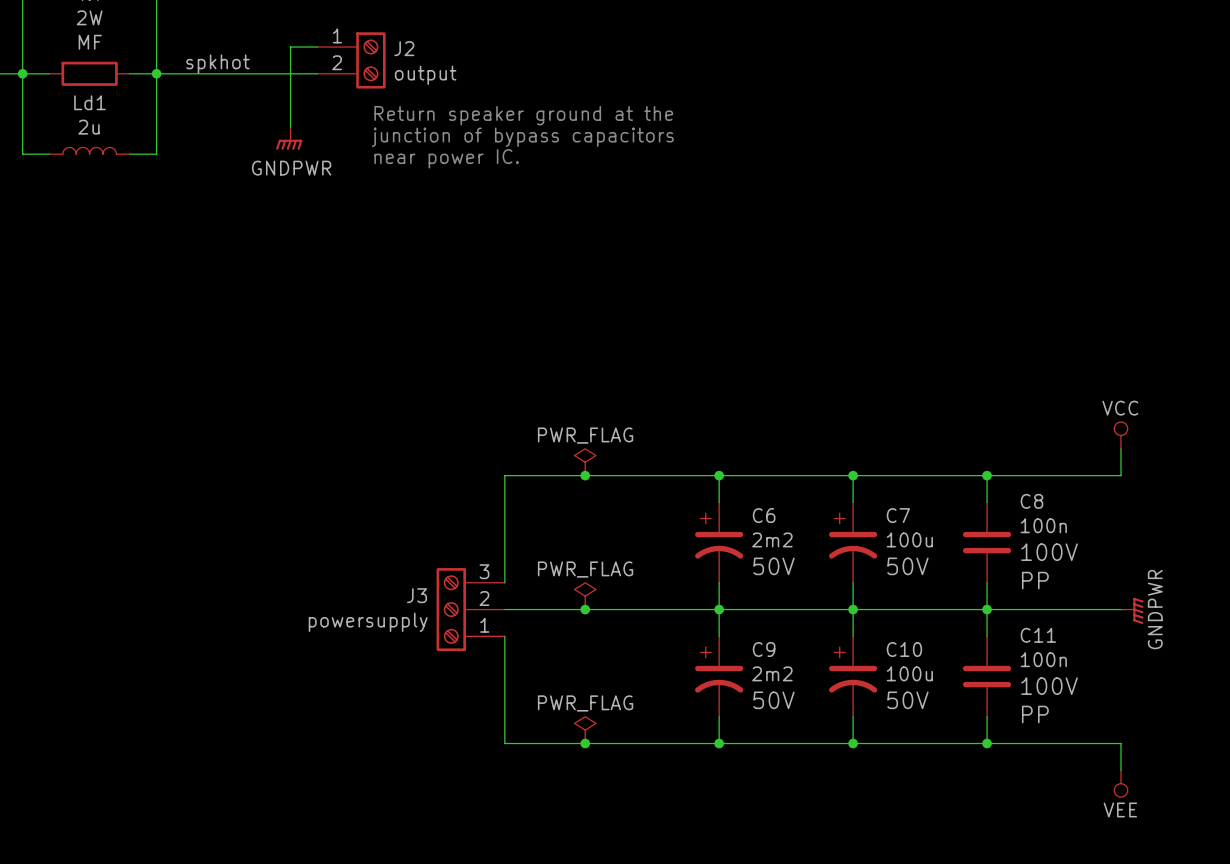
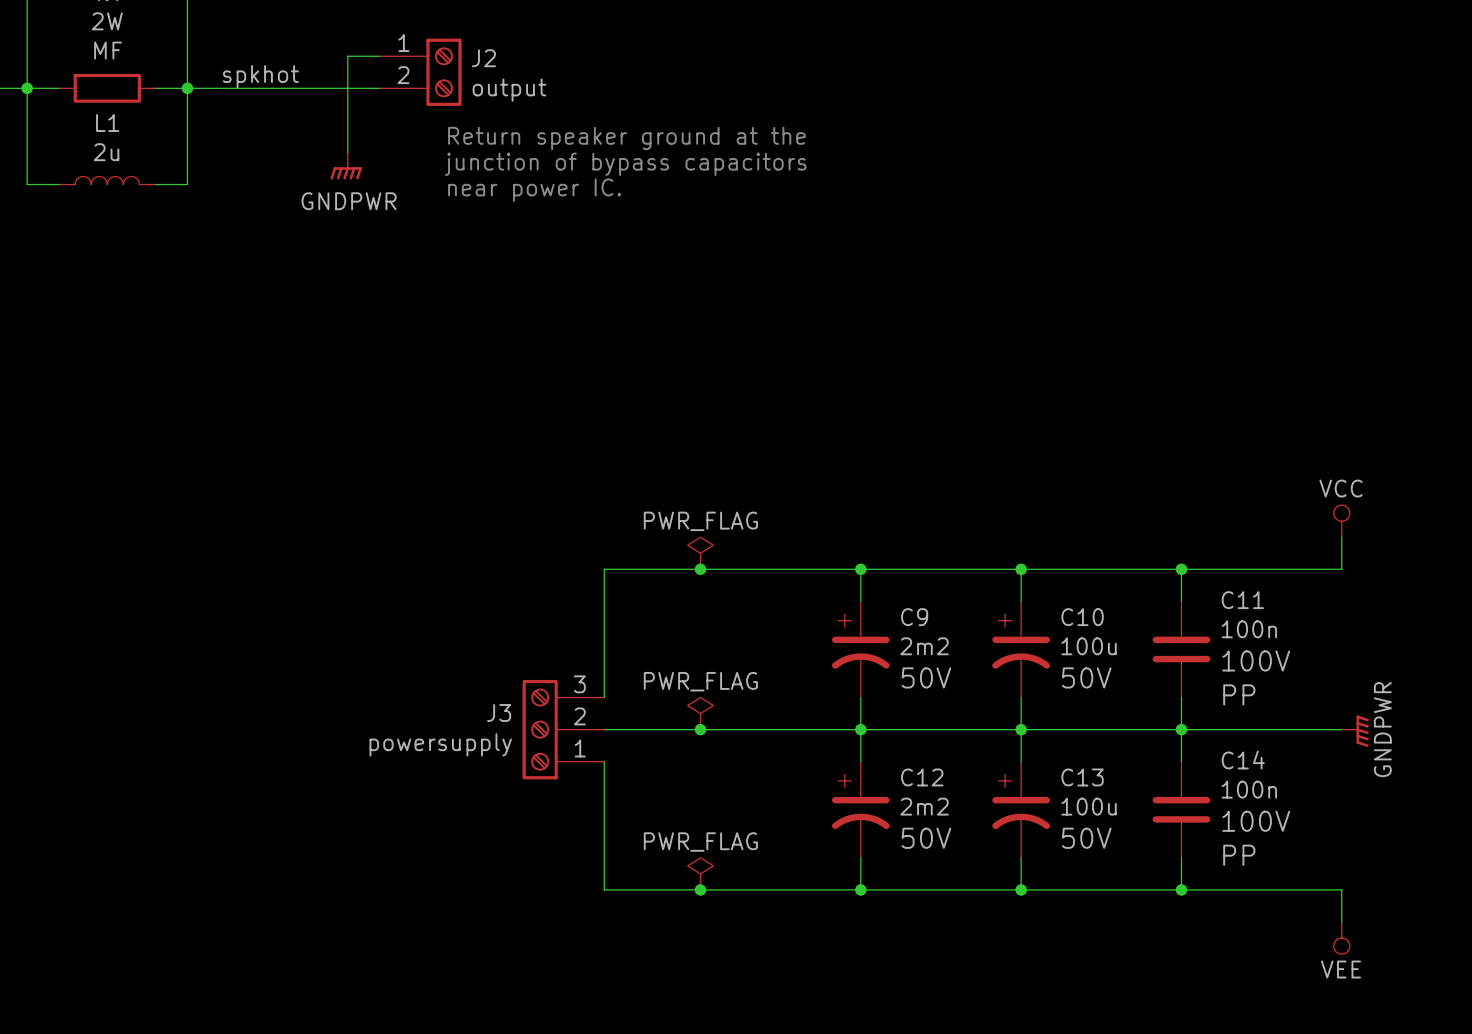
Ld1 name: Ld1 (89, 102) -> L1 (107, 123)
C8 name: C8 (1031, 501) -> C11 (1242, 600)
C6 name: C6 (764, 515) -> C9 (914, 617)
C7 name: C7 (898, 515) -> C10 (1082, 617)
C11 name: C11 (1038, 635) -> C14 (1243, 760)
C9 name: C9 (764, 649) -> C12 (922, 777)
C10 name: C10 (904, 649) -> C13 (1082, 777)

